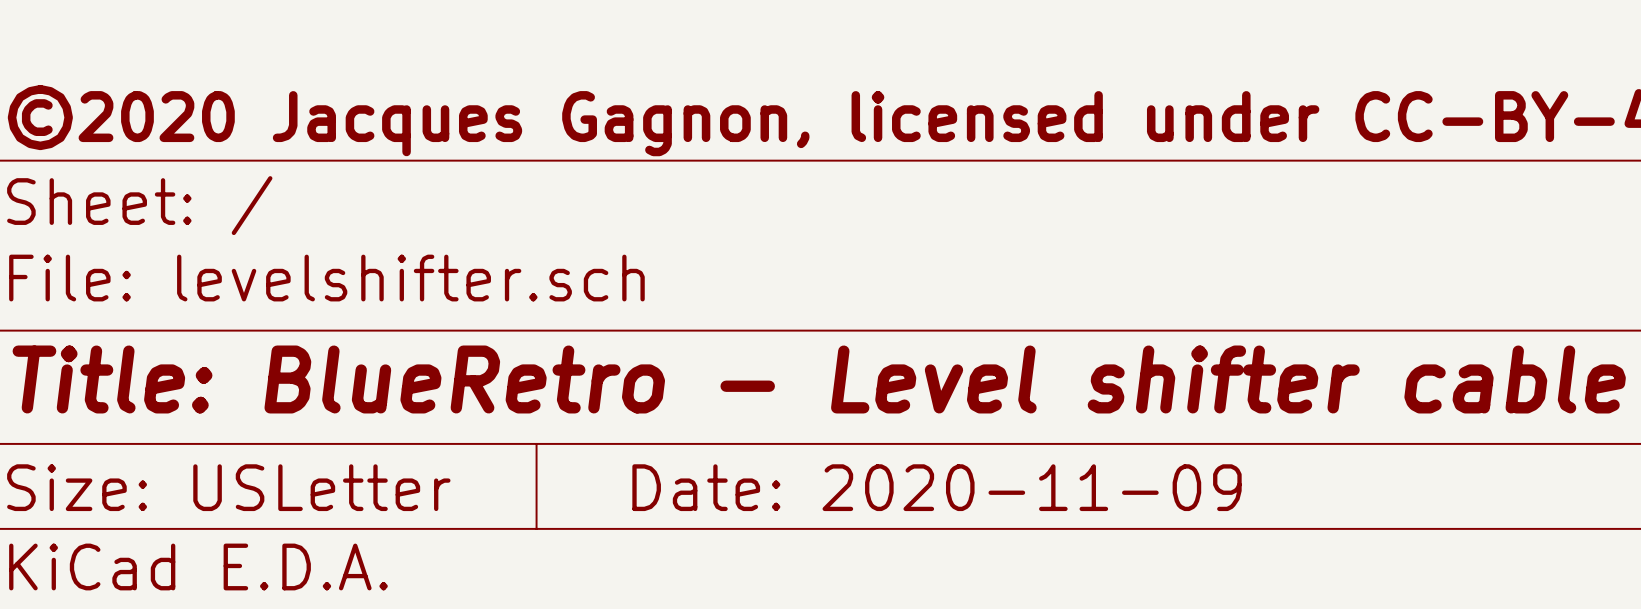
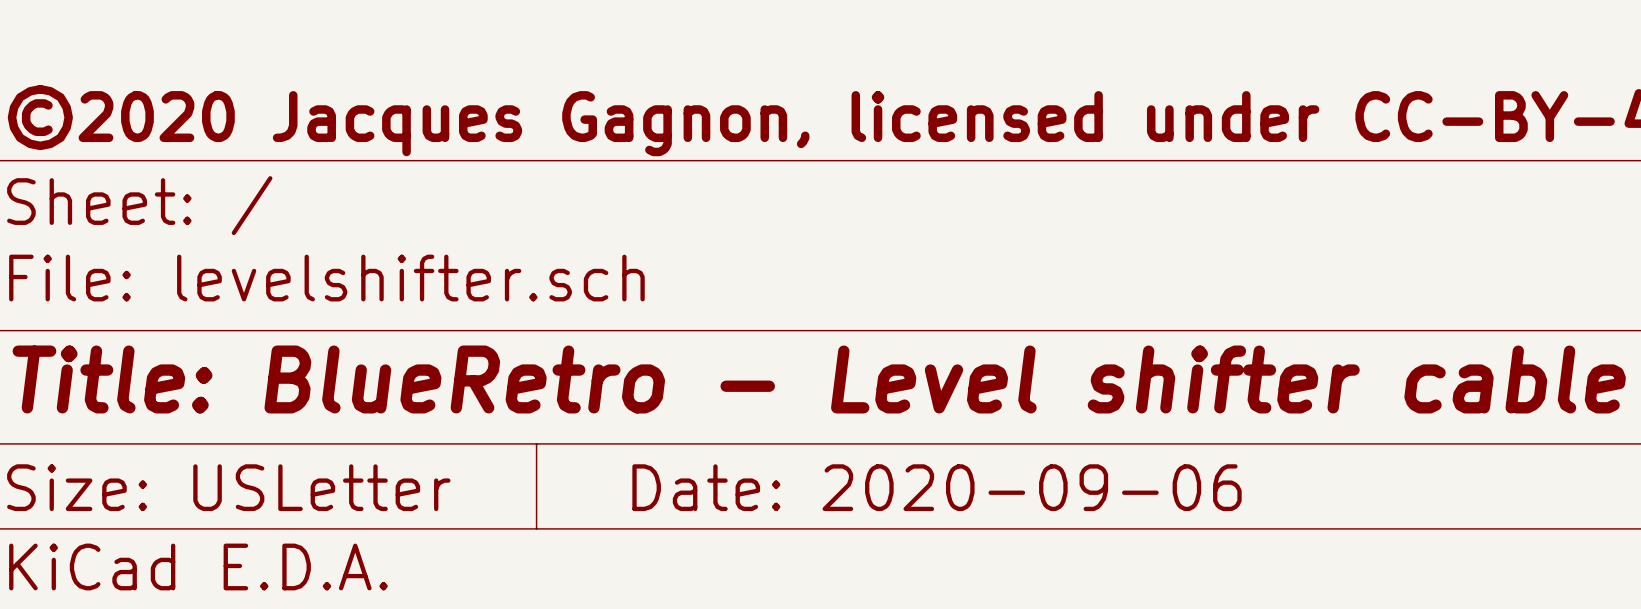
title block: Date: 2020-11-09 (937, 487) -> Date: 2020-09-06 (937, 487)

